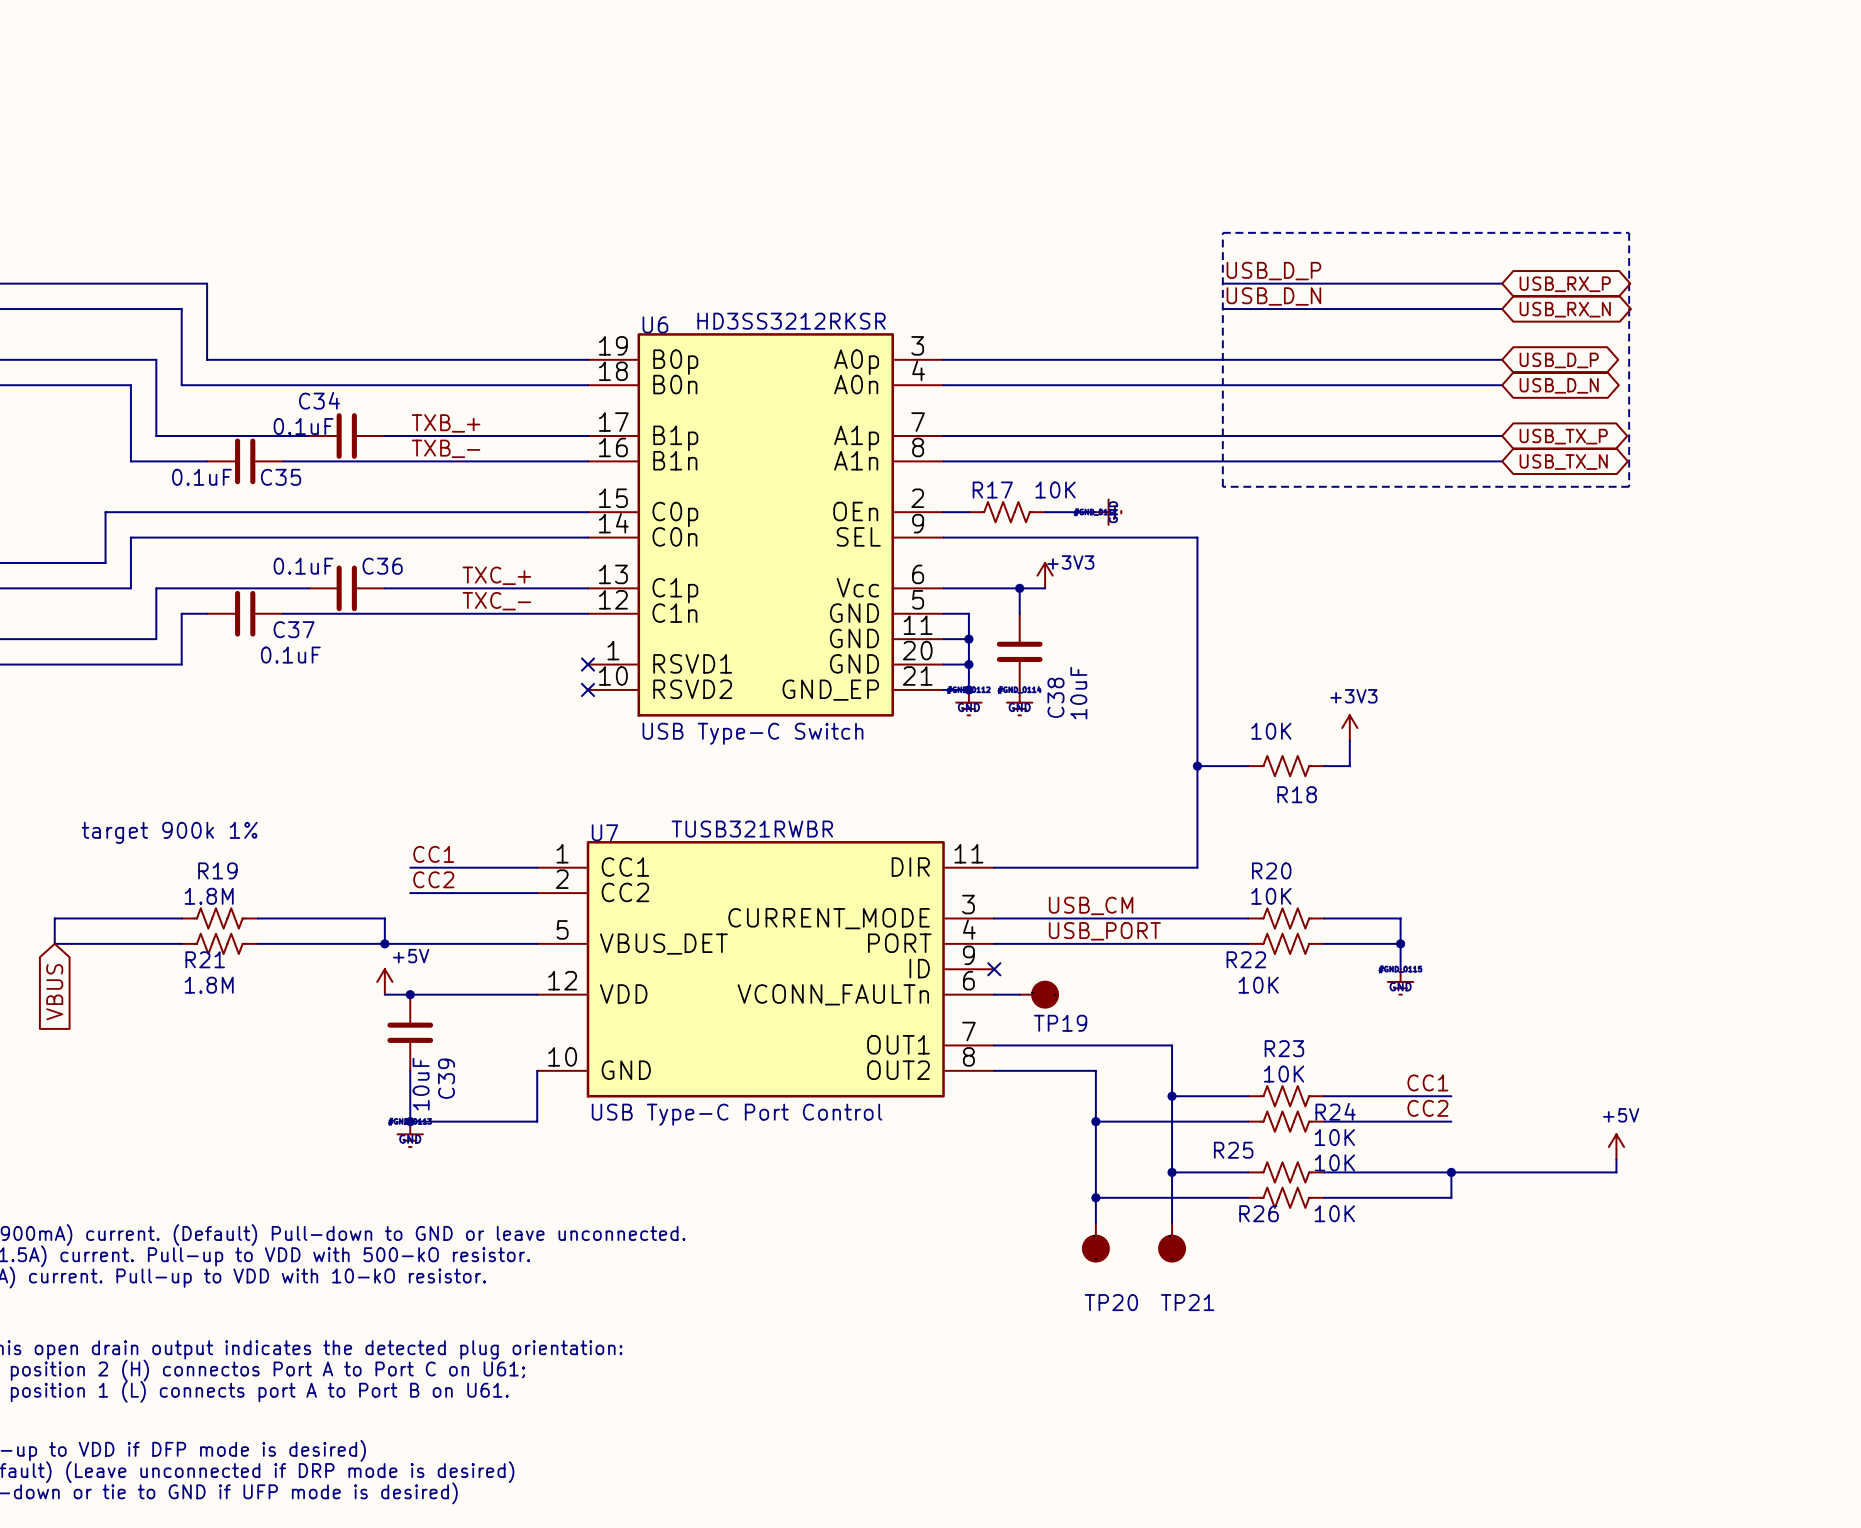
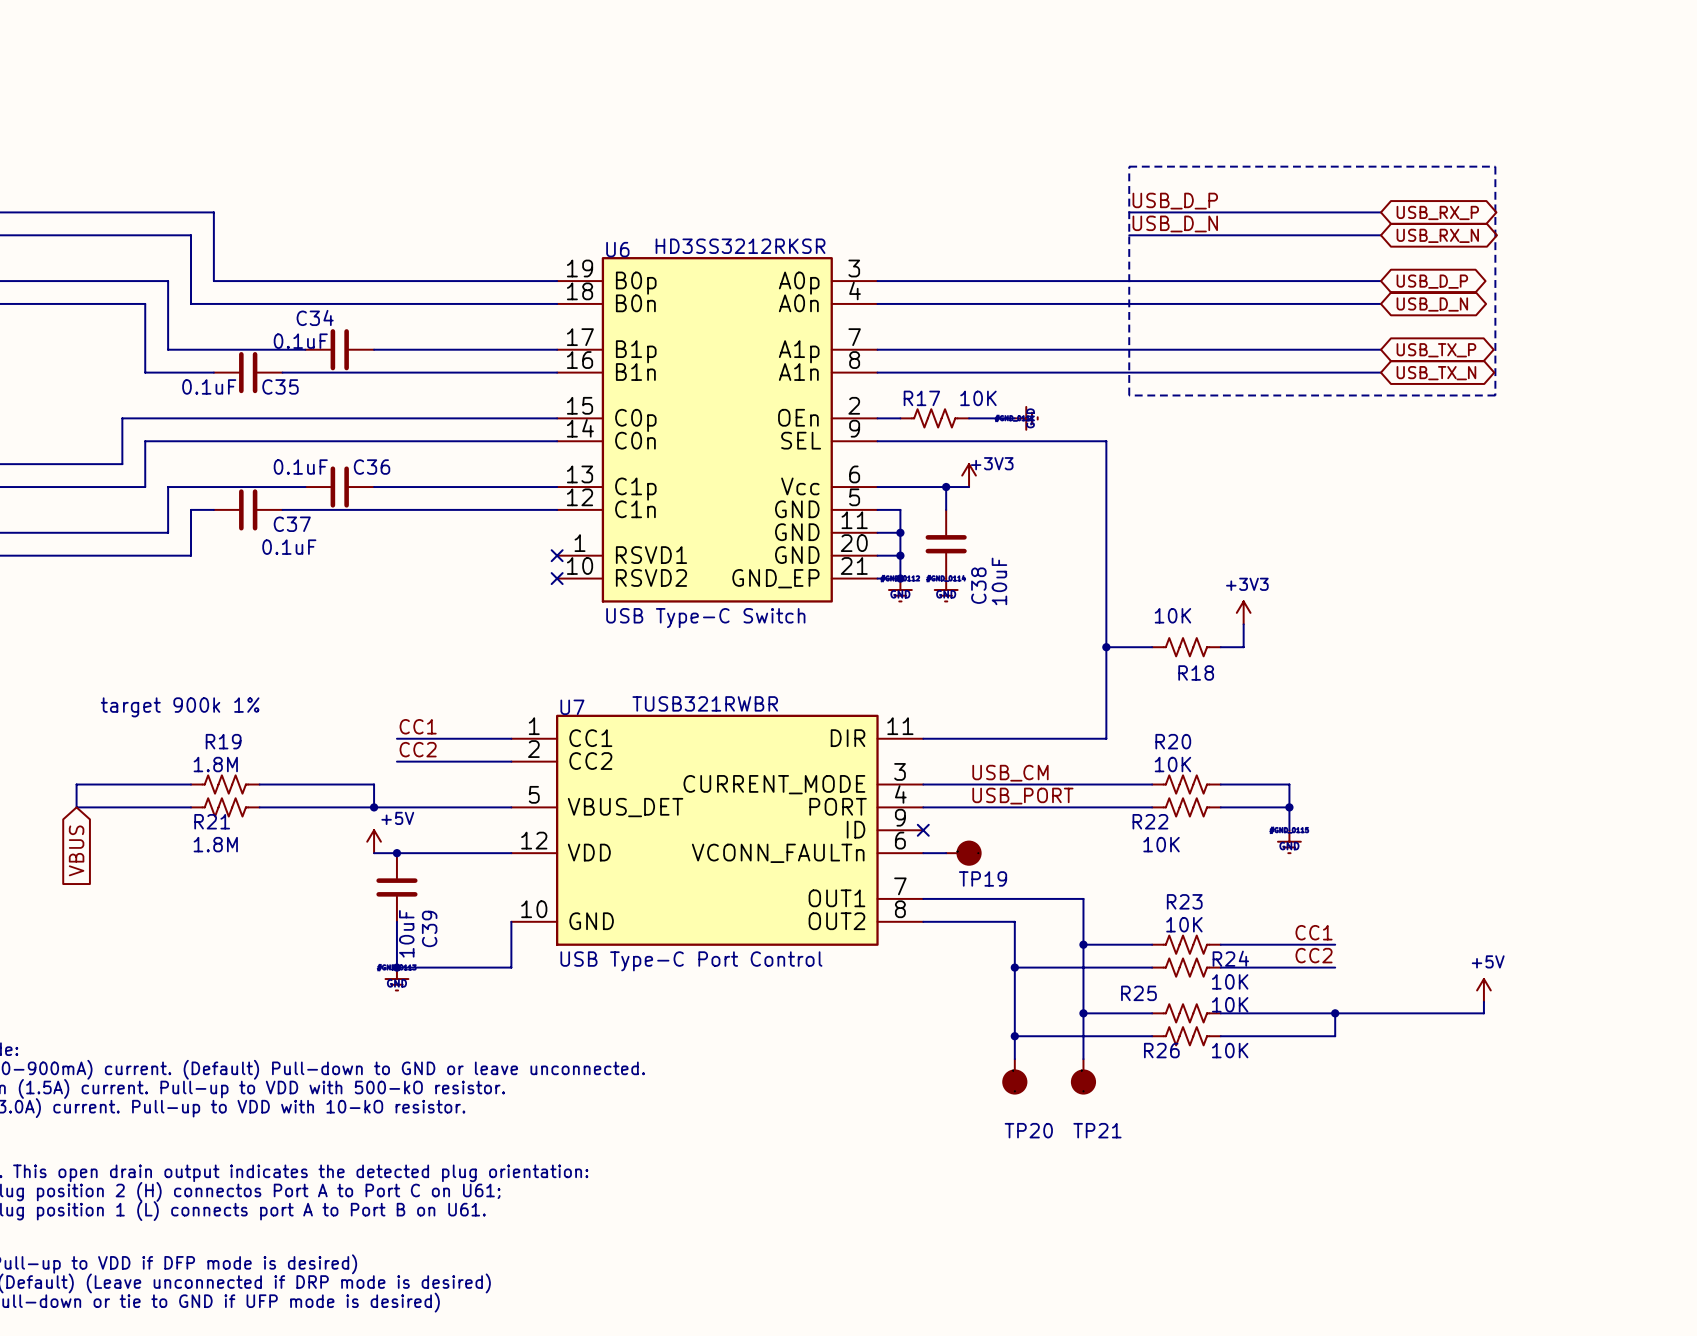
label: TXB_+ (446, 423) -> none
label: TXB_- (446, 448) -> none
label: TXC_+ (496, 575) -> none
label: TXC_- (496, 601) -> none

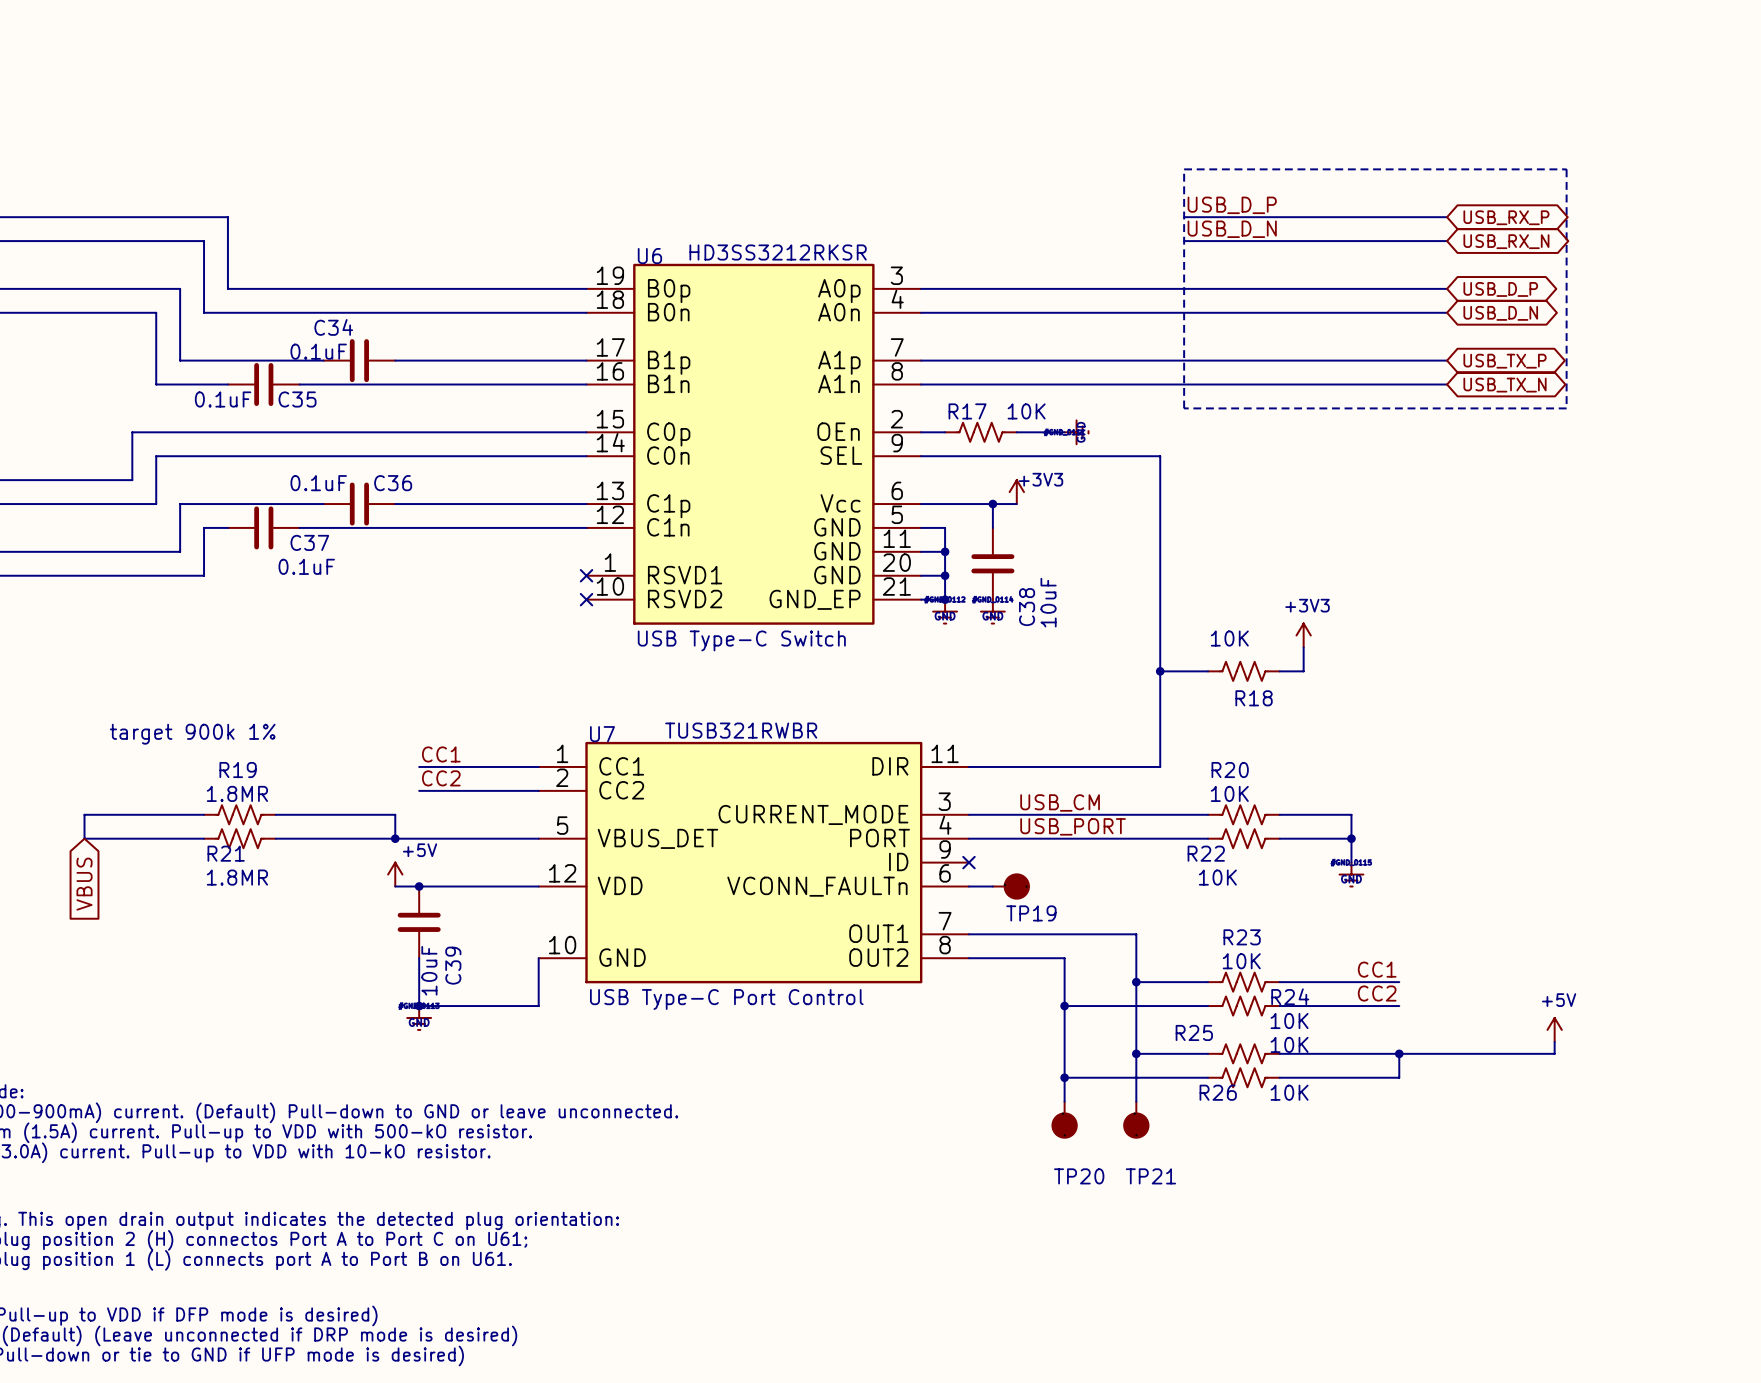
R21 value: 1.8M (215, 764) -> 1.8MR (237, 793)
R19 value: 1.8M (215, 844) -> 1.8MR (237, 877)

